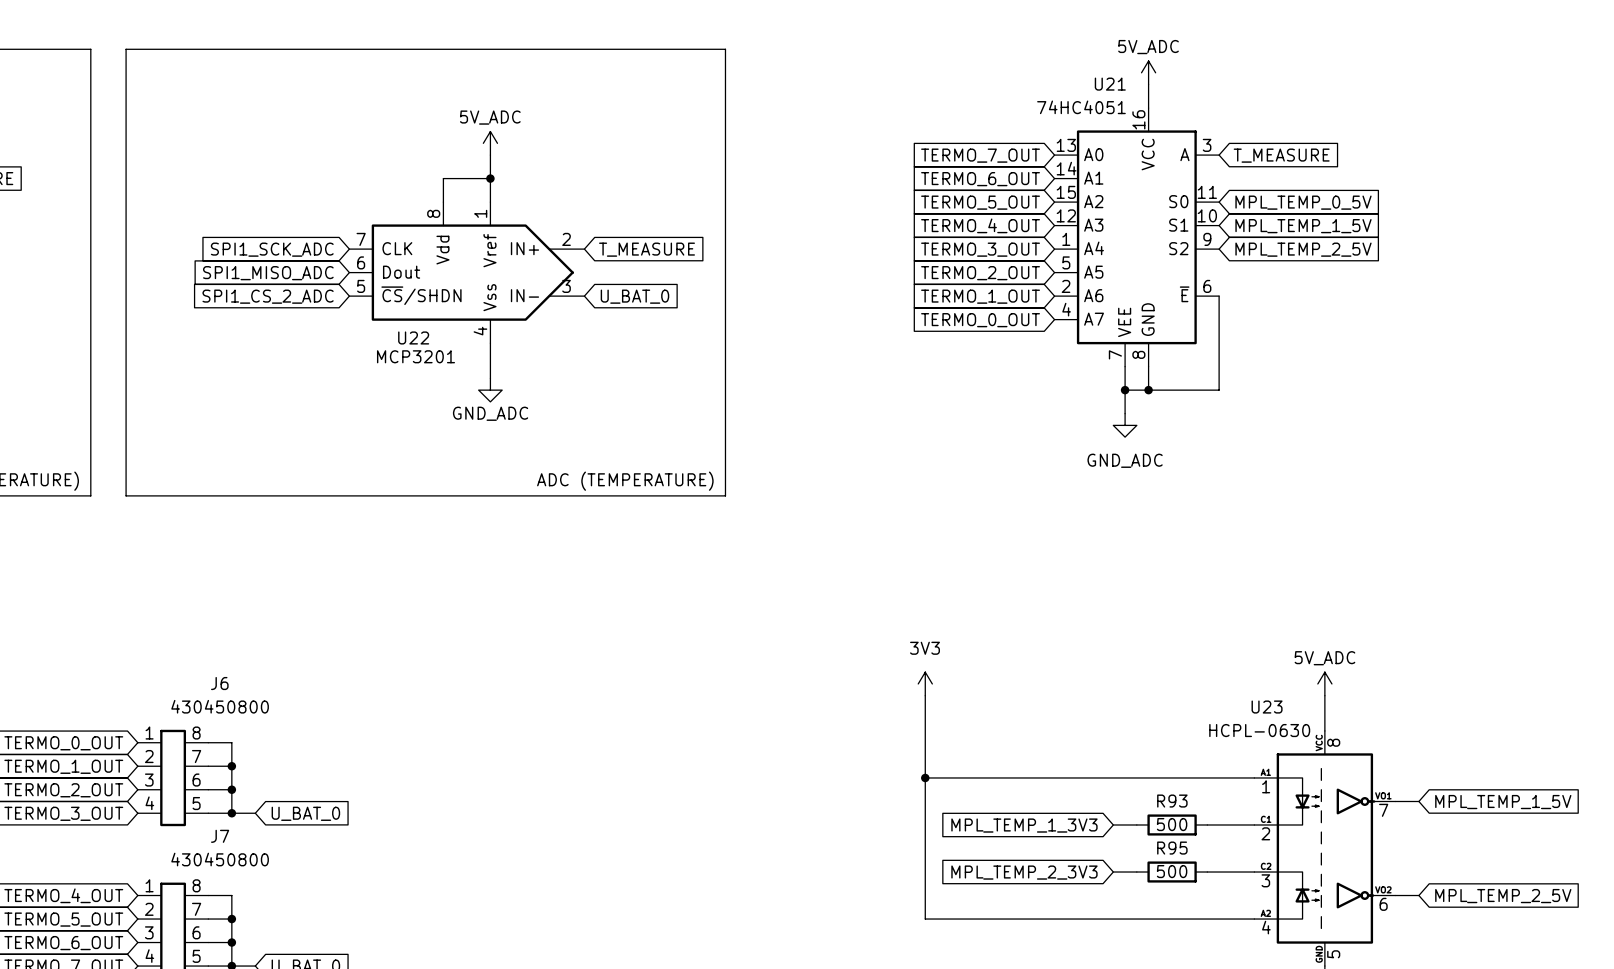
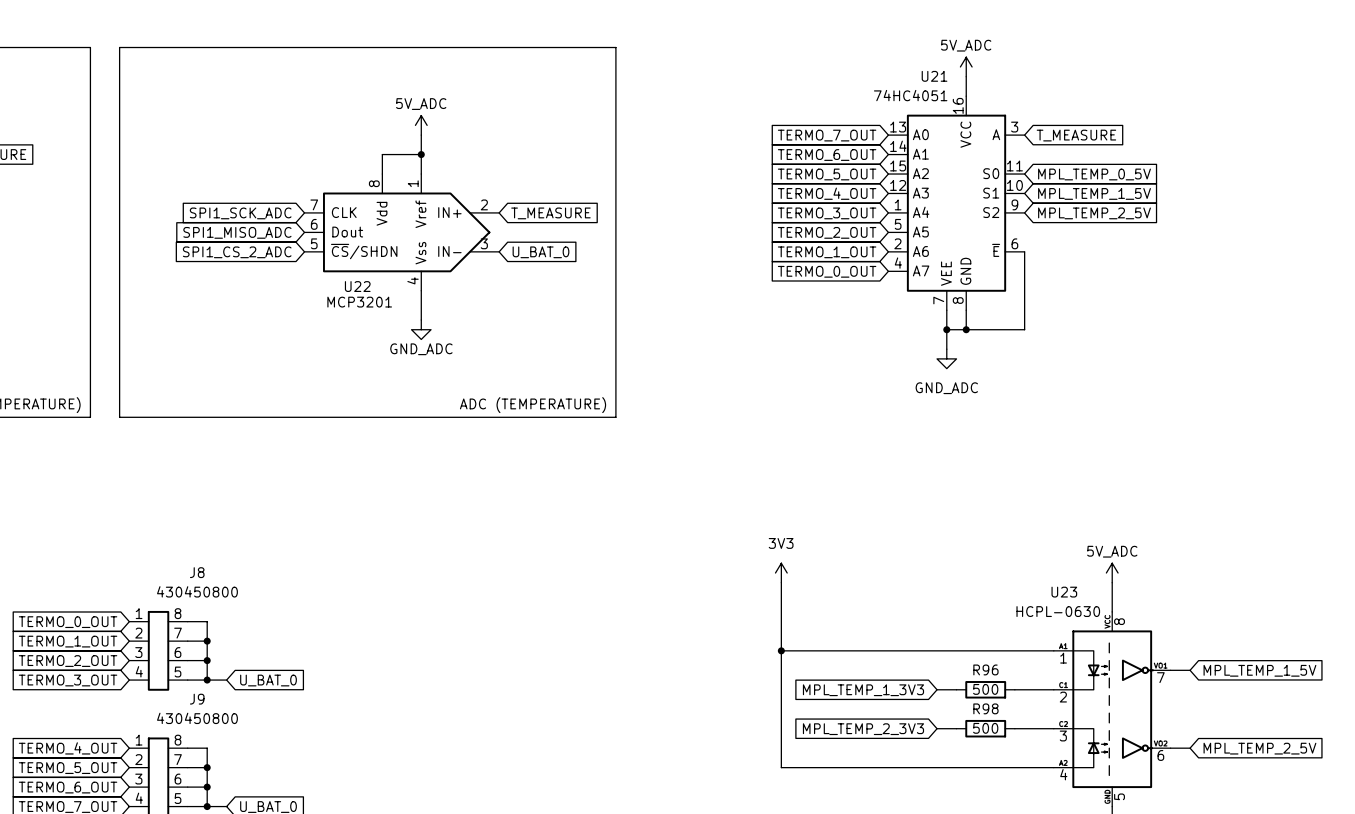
J6 name: J6 (219, 683) -> J8 (197, 572)
R93 name: R93 (1172, 801) -> R96 (985, 669)
J7 name: J7 (220, 836) -> J9 (197, 699)
R95 name: R95 (1172, 848) -> R98 (985, 708)

